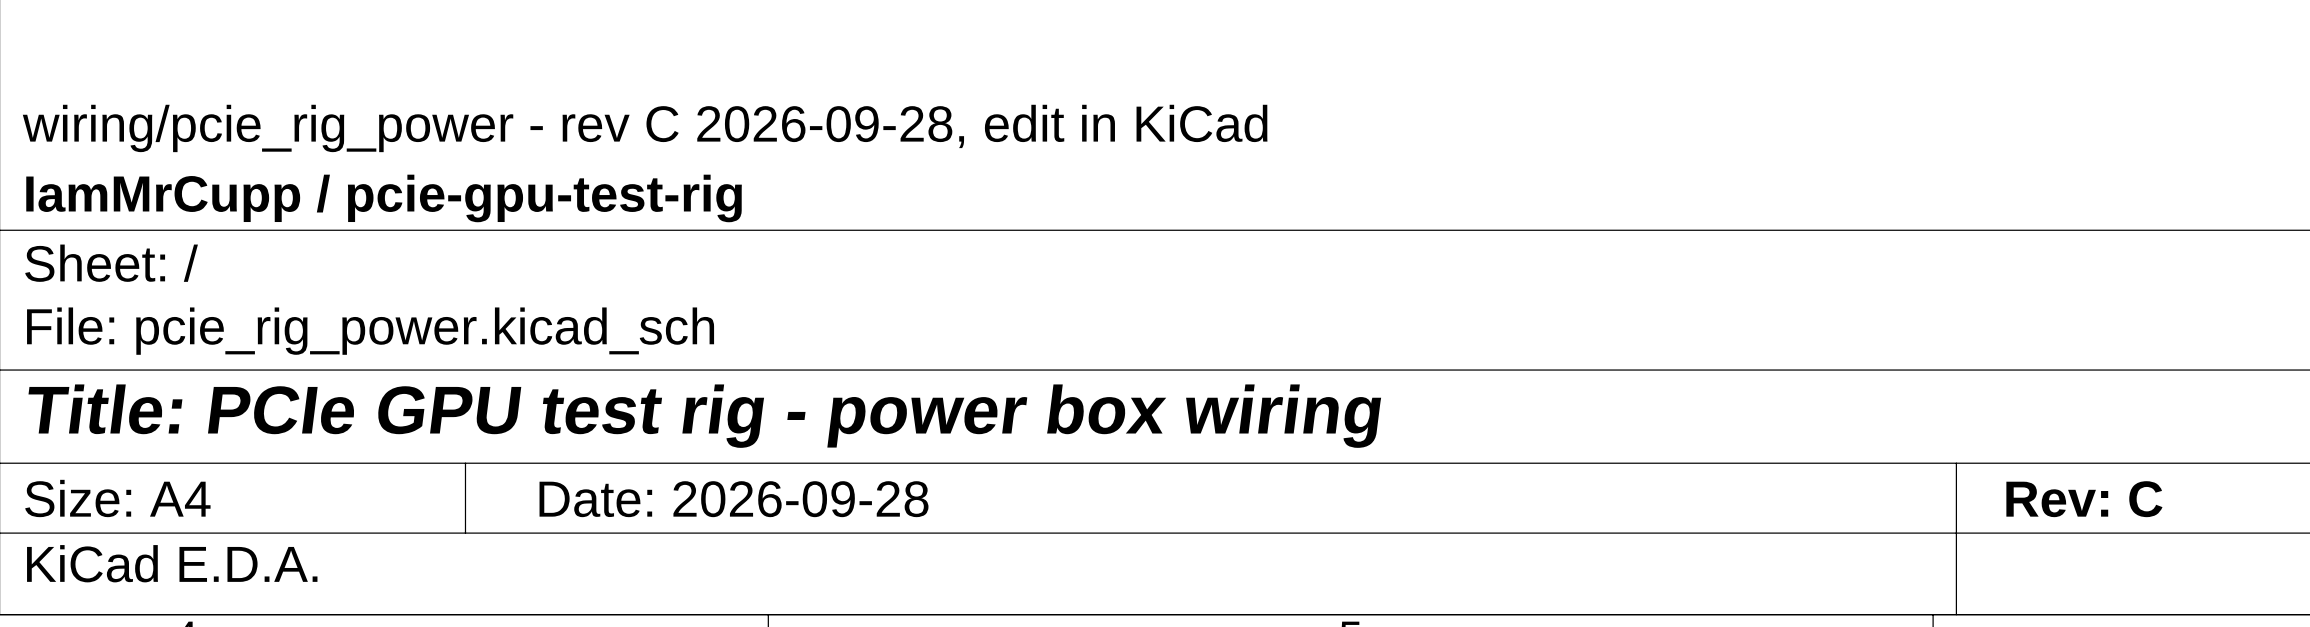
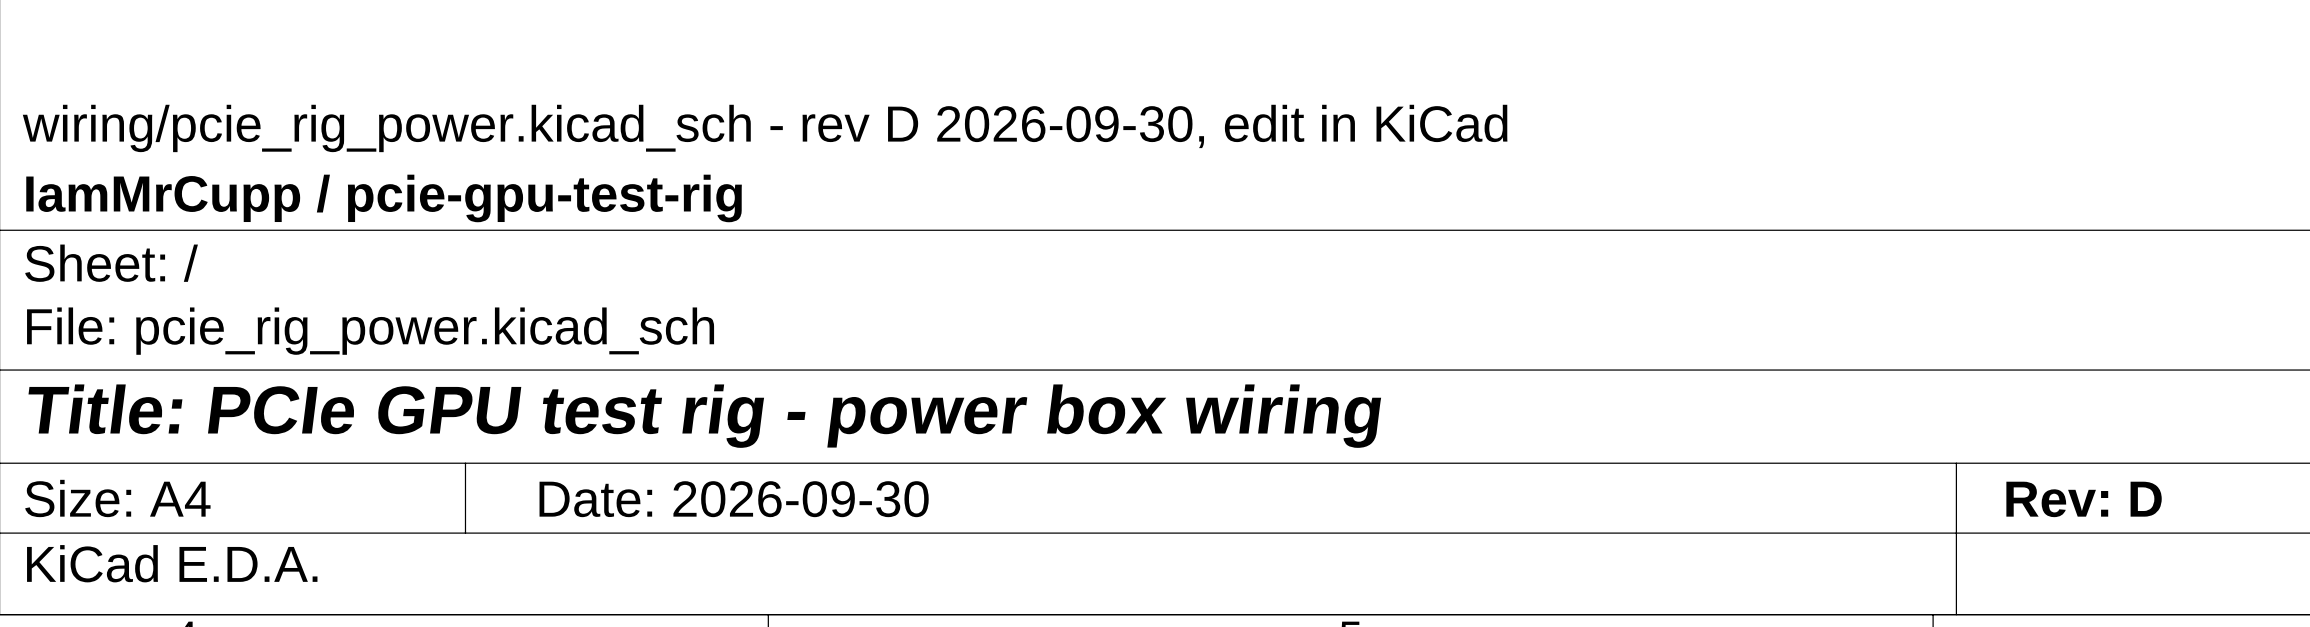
title block: wiring/pcie_rig_power - rev C 2026-09-28, edit in KiCad (645, 128) -> wiring/pcie_rig_power.kicad_sch - rev D 2026-09-30, edit in KiCad (765, 128)
title block: Date: 2026-09-28 (734, 499) -> Date: 2026-09-30 (734, 499)
title block: Rev: C (2084, 499) -> Rev: D (2084, 499)

